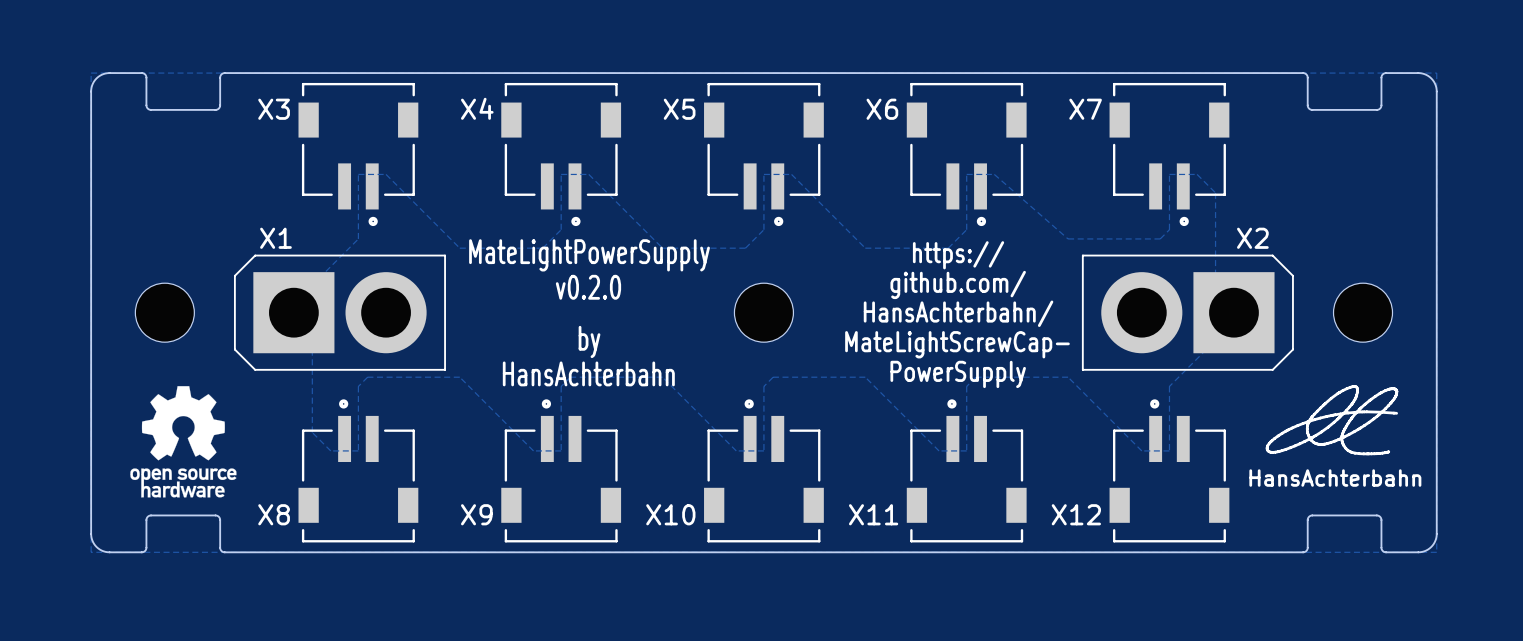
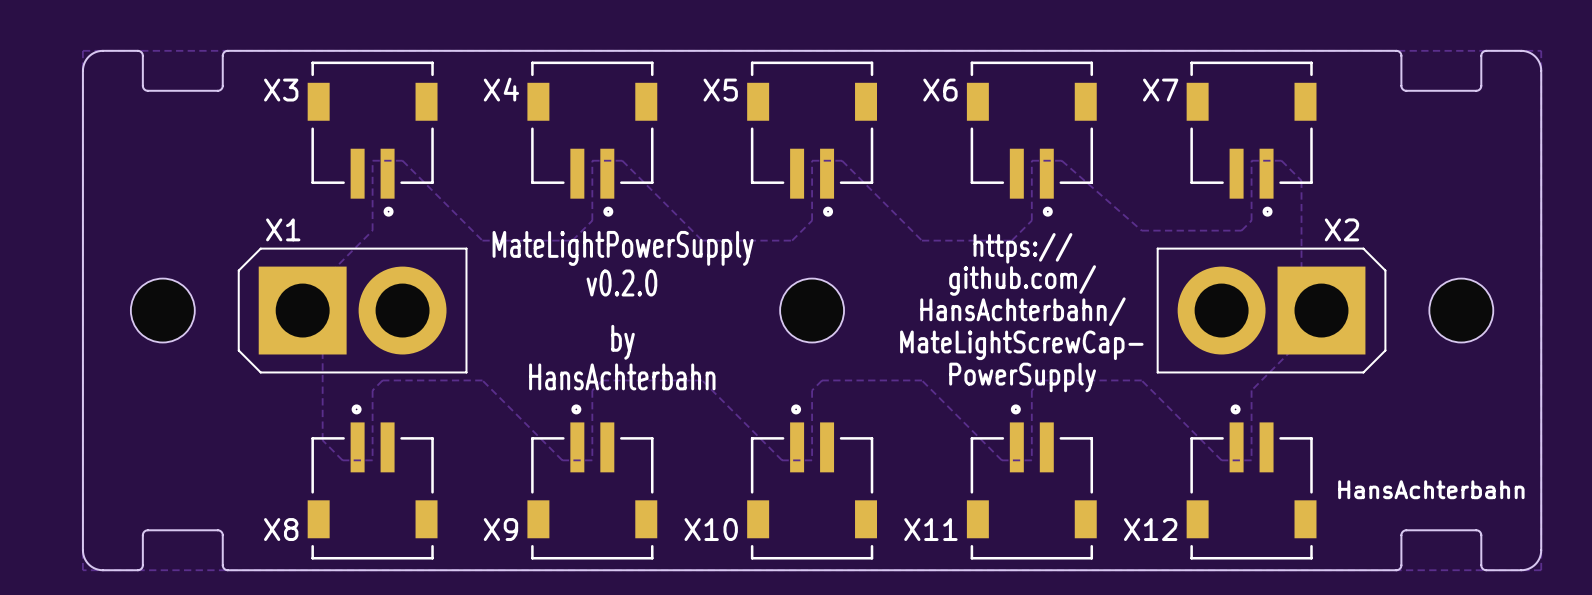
drawing: [1265, 385, 1399, 456] -> none
drawing: [130, 386, 237, 498] -> none

